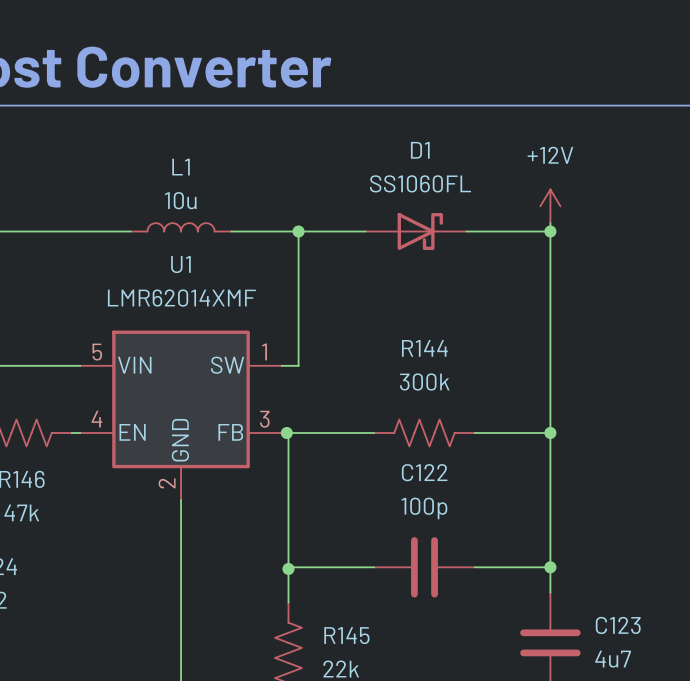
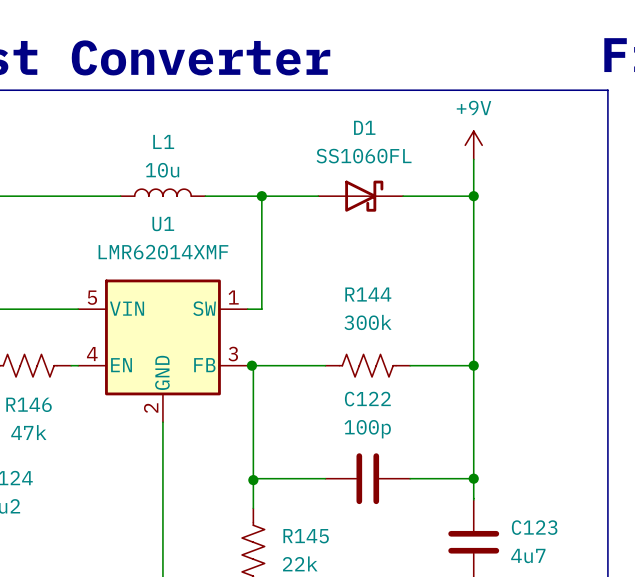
power symbol: none -> +9V (473, 145)
power symbol: +12V (550, 206) -> none

